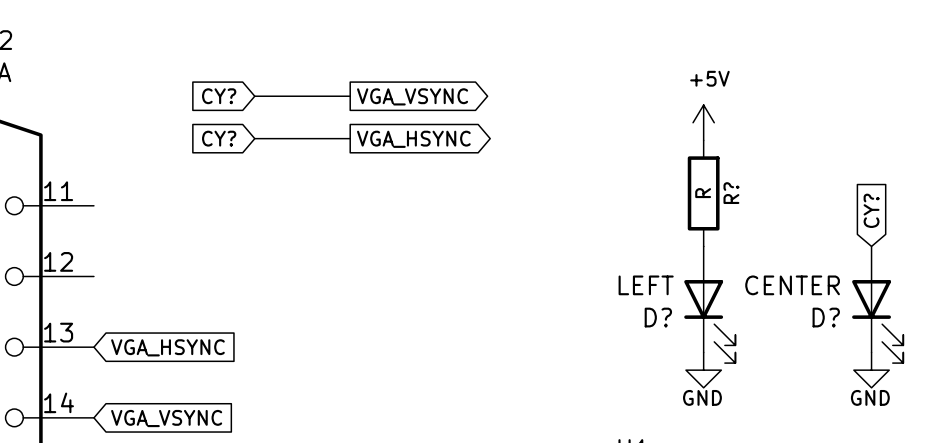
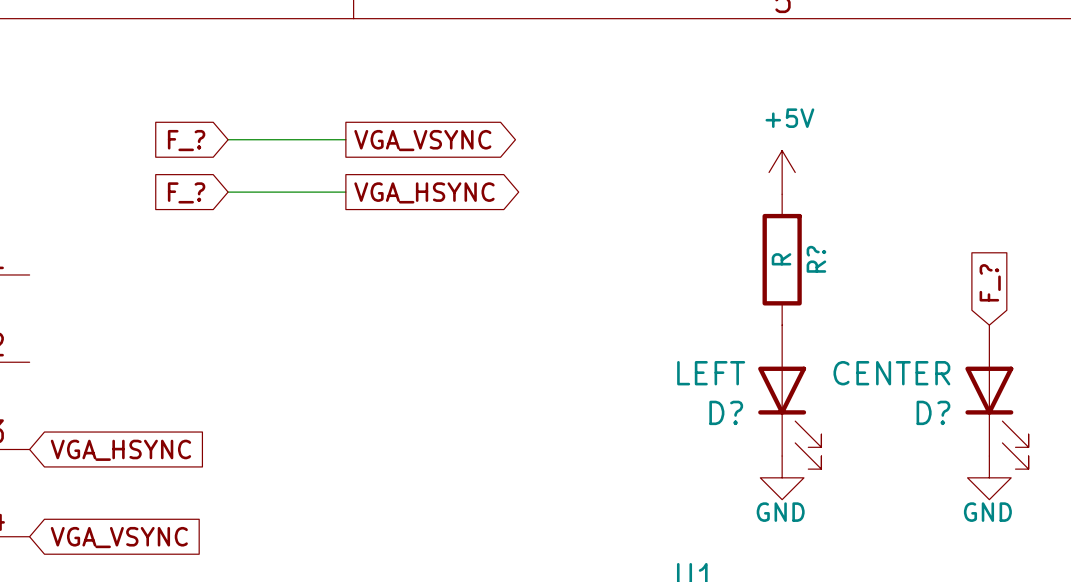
global label: CY? (219, 96) -> F_? (186, 140)
global label: CY? (219, 138) -> F_? (186, 192)
global label: CY? (871, 210) -> F_? (990, 282)

